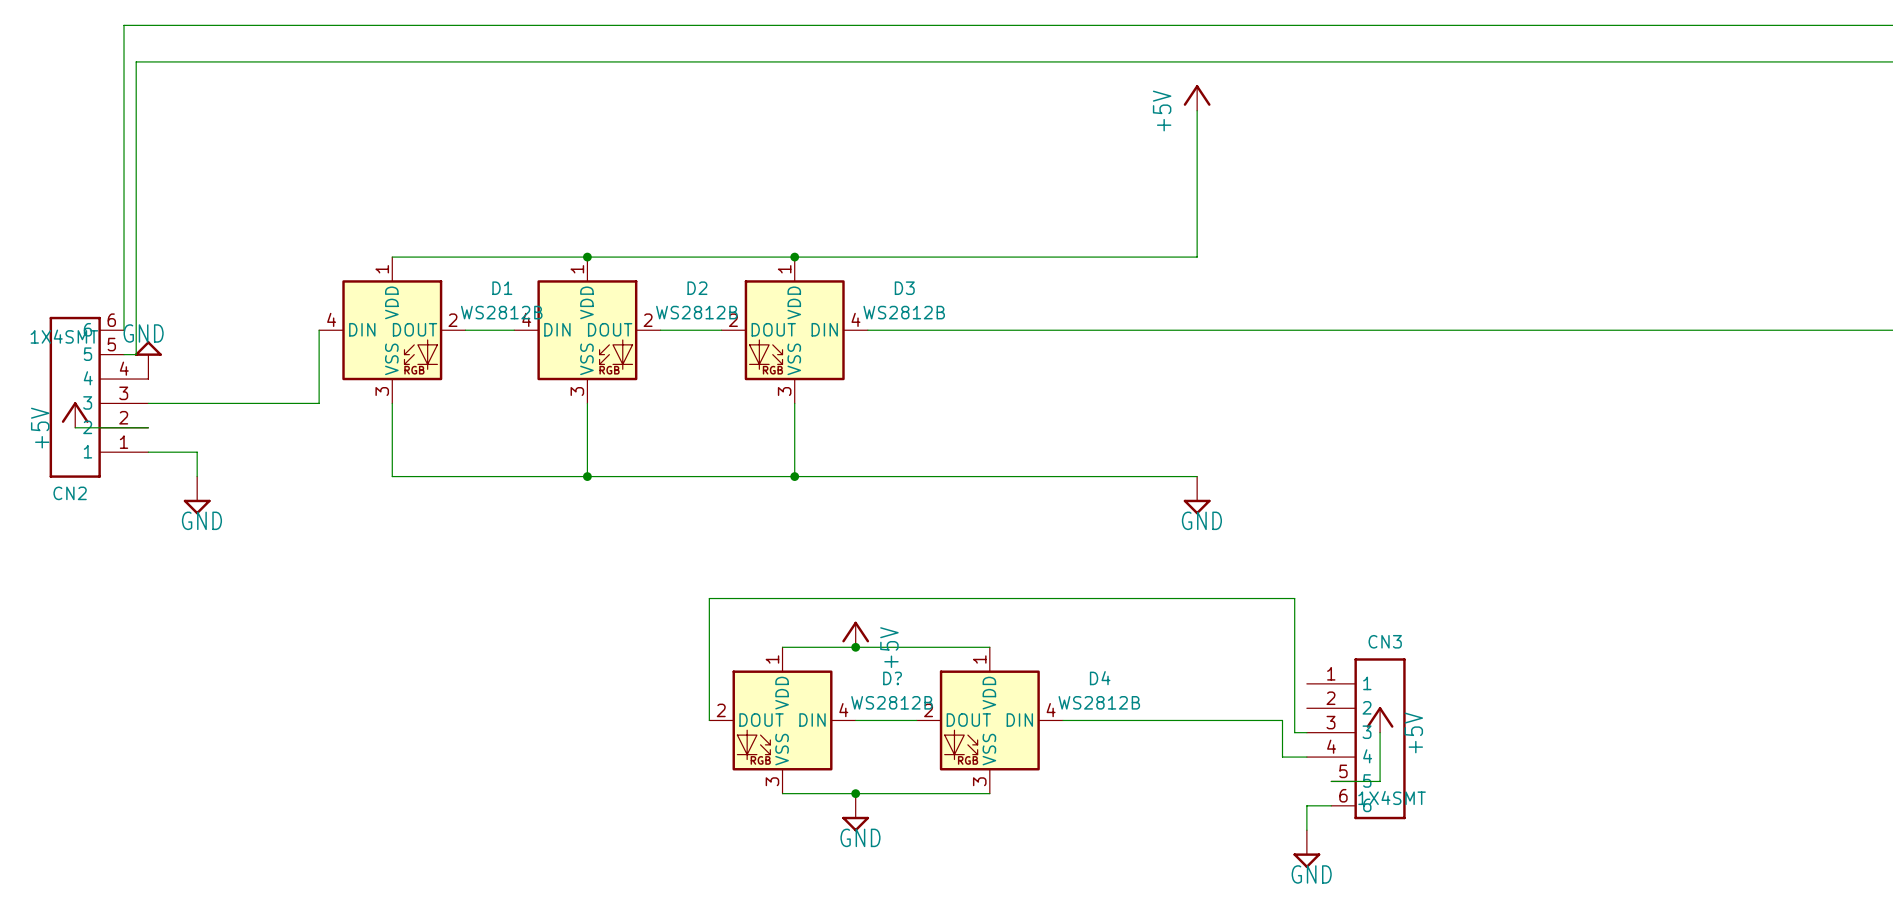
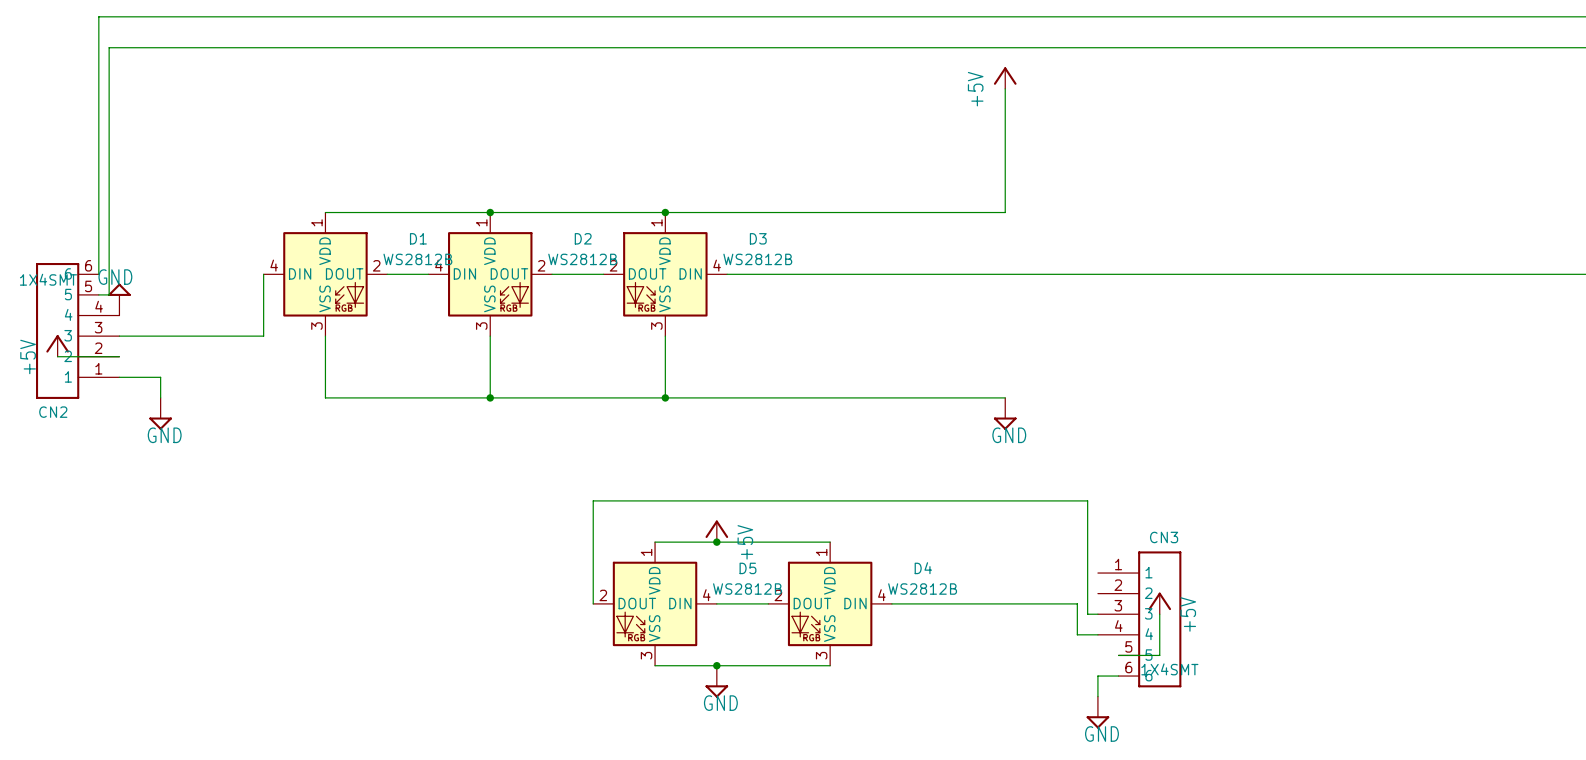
D? name: D? (892, 678) -> D5 (747, 568)

